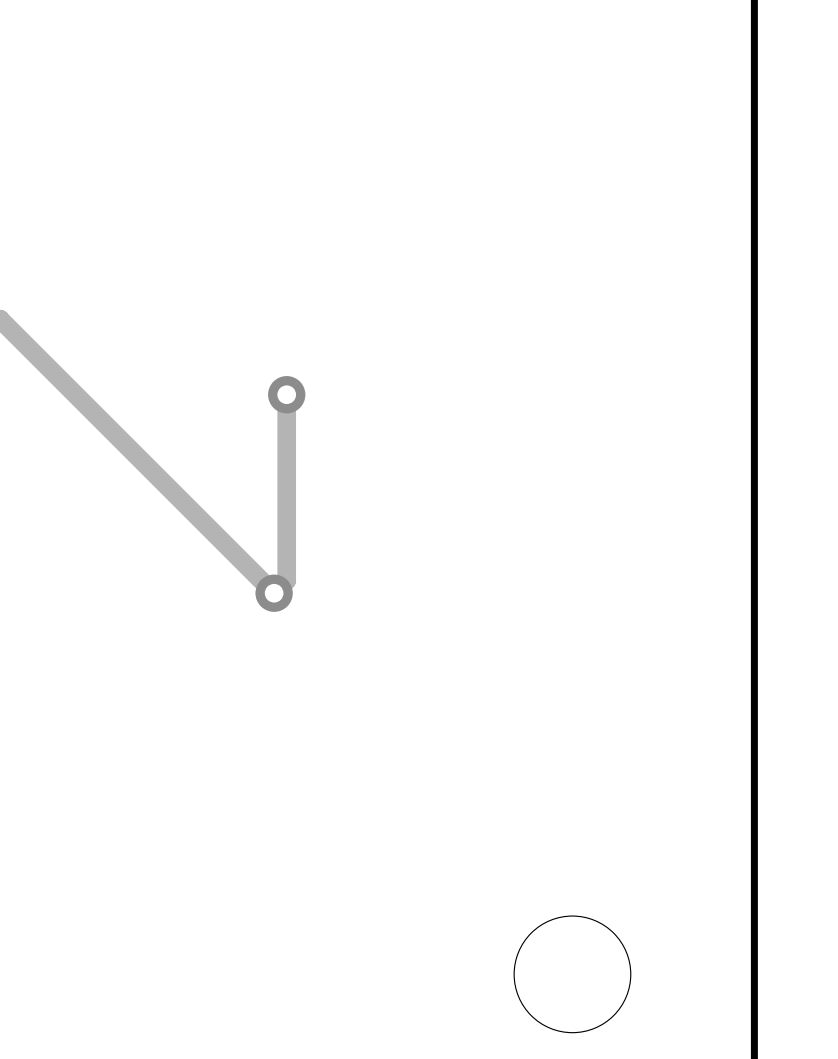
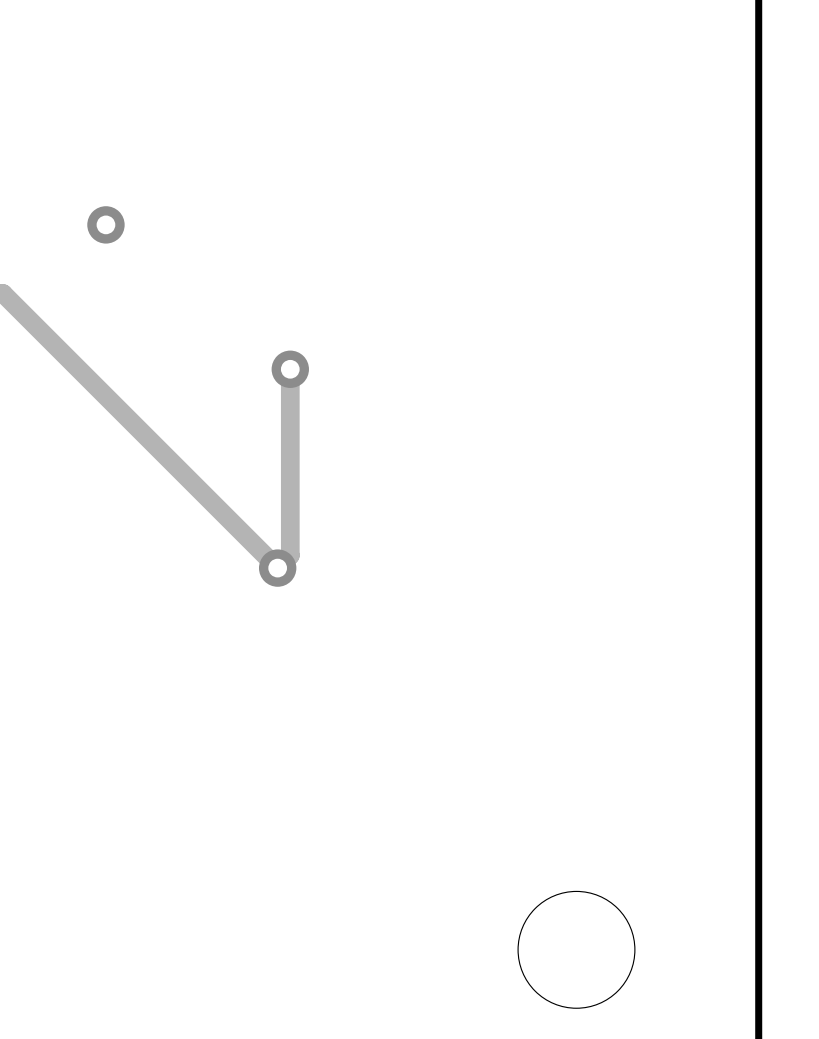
via: none -> (105, 224)

